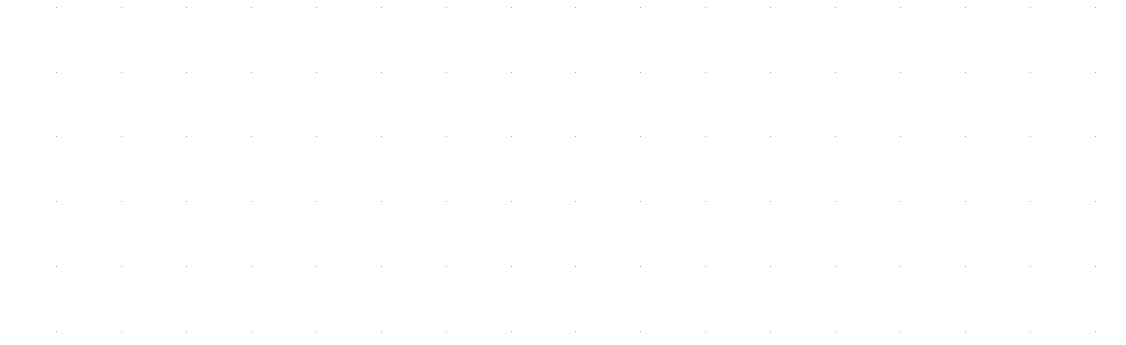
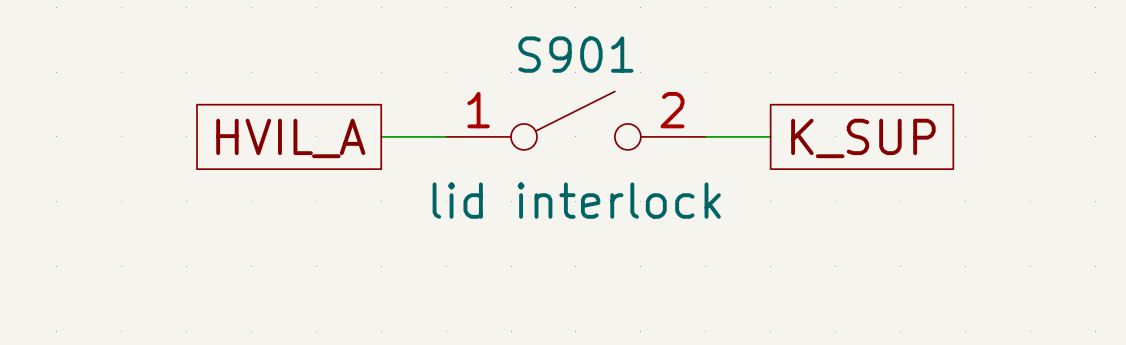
S901: none -> lid interlock (575, 120)
wire: none -> (381, 136) (446, 136)
wire: none -> (705, 136) (770, 136)
global label: none -> HVIL_A (290, 138)
global label: none -> K_SUP (863, 138)

